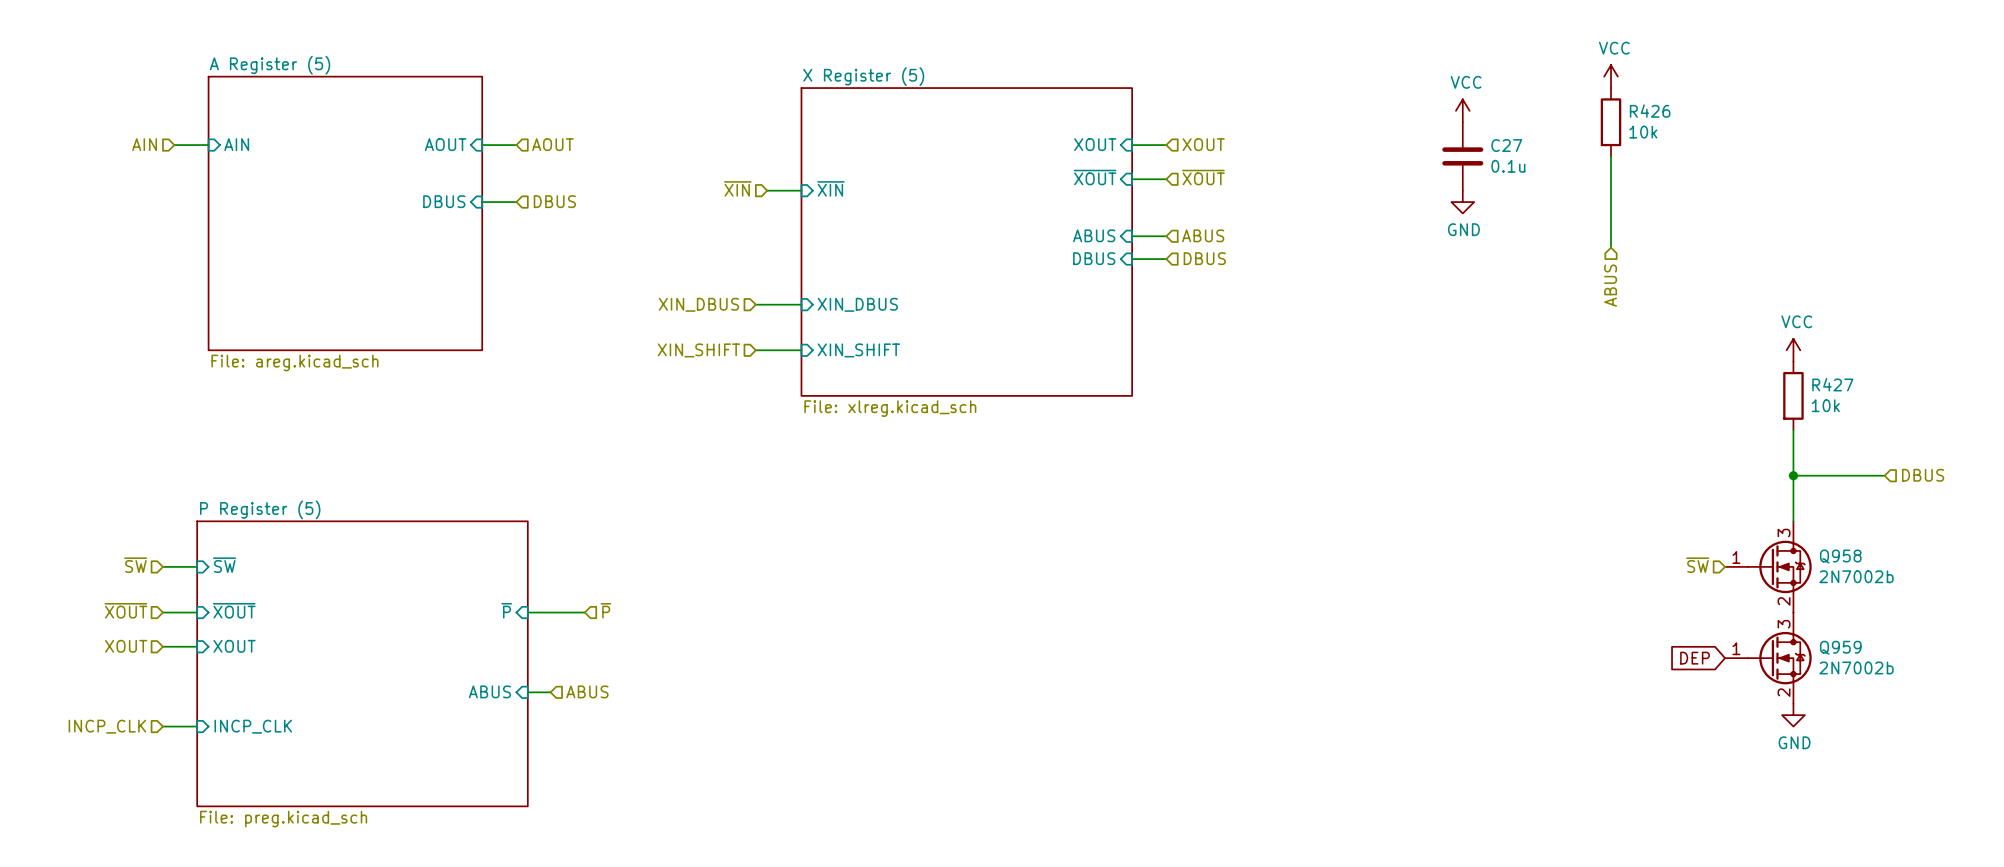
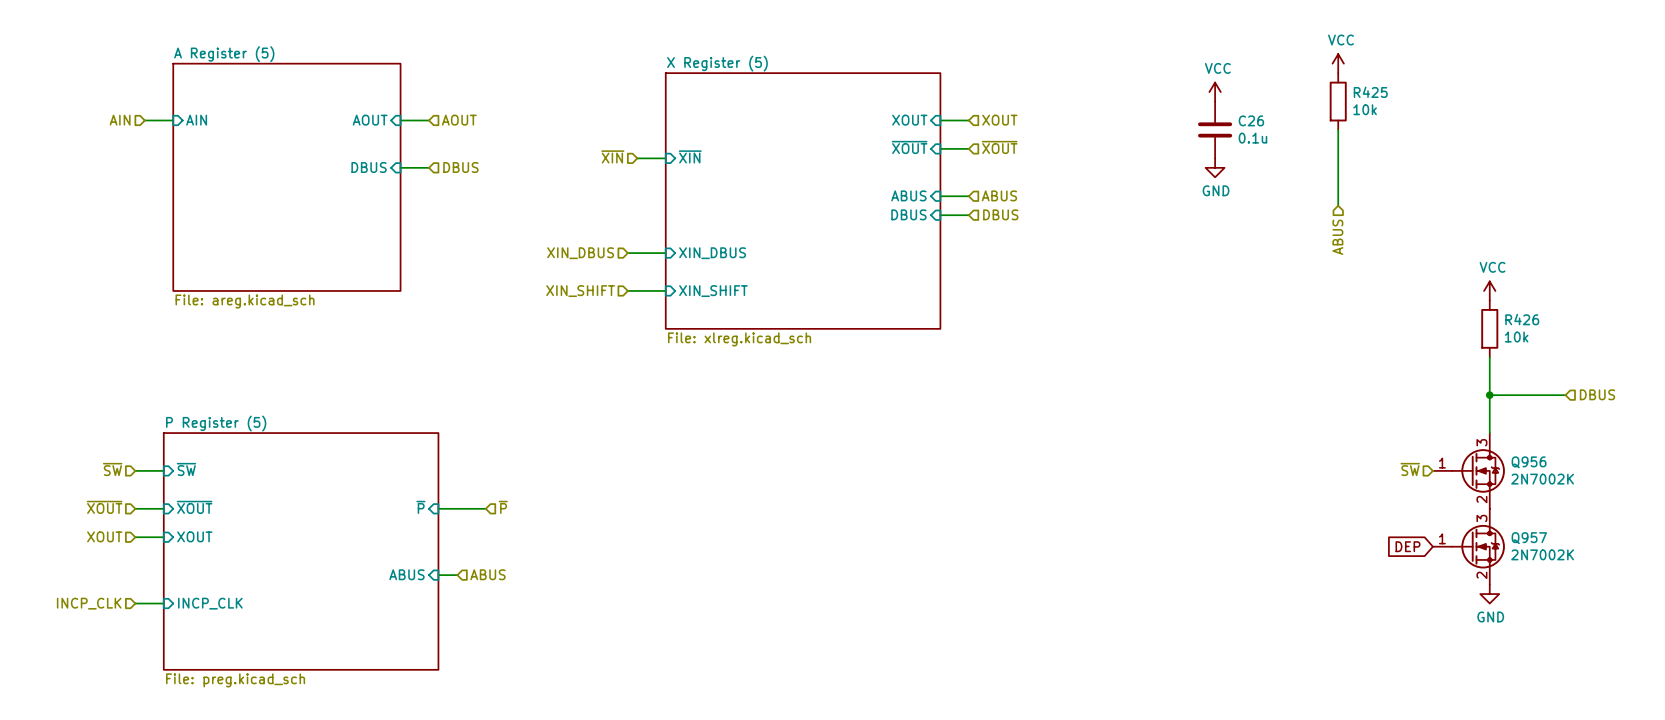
R426 name: R426 (1650, 111) -> R425 (1370, 92)
C27 name: C27 (1506, 145) -> C26 (1251, 120)
R427 name: R427 (1832, 384) -> R426 (1522, 319)
Q958 name: Q958 (1840, 556) -> Q956 (1529, 462)
Q958 value: 2N7002b (1856, 576) -> 2N7002K (1542, 479)
Q959 name: Q959 (1840, 647) -> Q957 (1529, 538)
Q959 value: 2N7002b (1856, 667) -> 2N7002K (1542, 554)

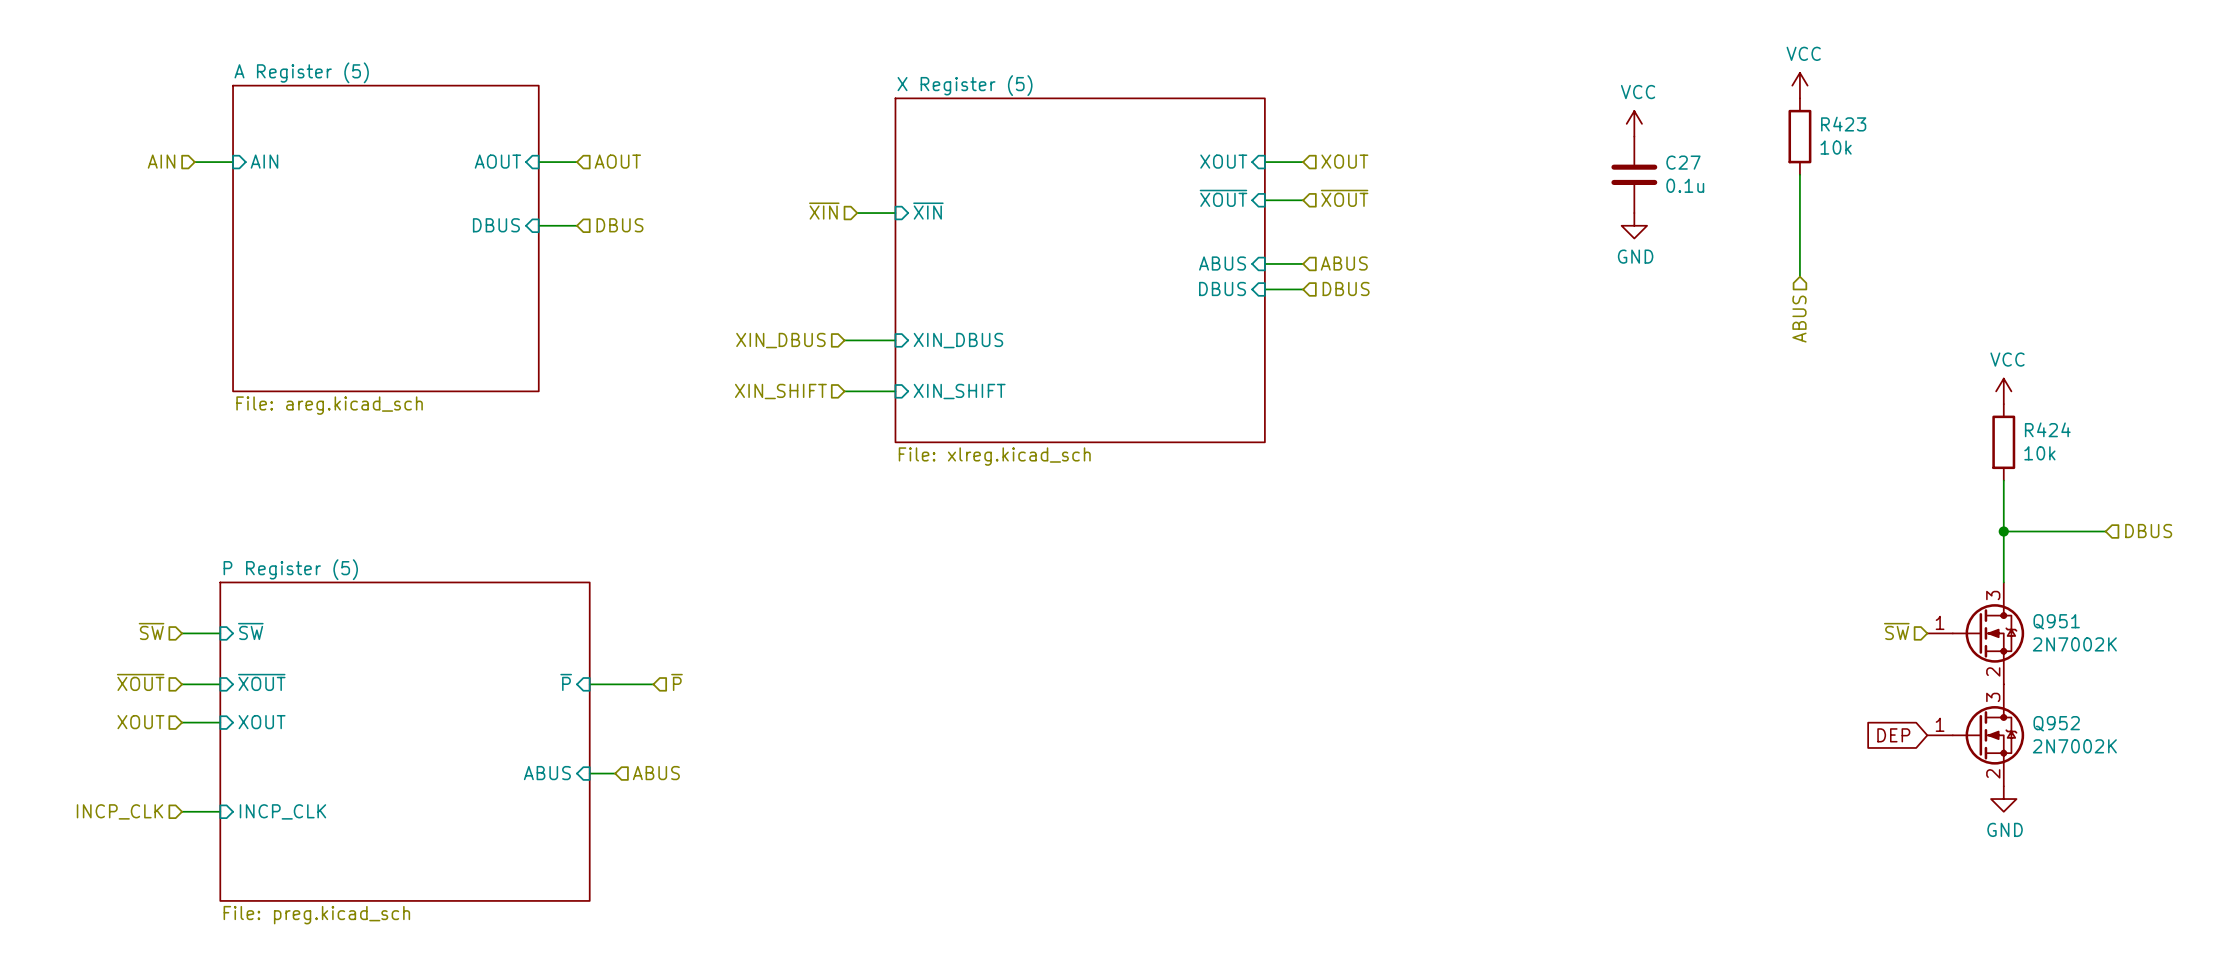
R425 name: R425 (1370, 92) -> R423 (1843, 124)
C26 name: C26 (1251, 120) -> C27 (1683, 162)
R426 name: R426 (1522, 319) -> R424 (2047, 429)
Q956 name: Q956 (1529, 462) -> Q951 (2056, 621)
Q957 name: Q957 (1529, 538) -> Q952 (2056, 723)

